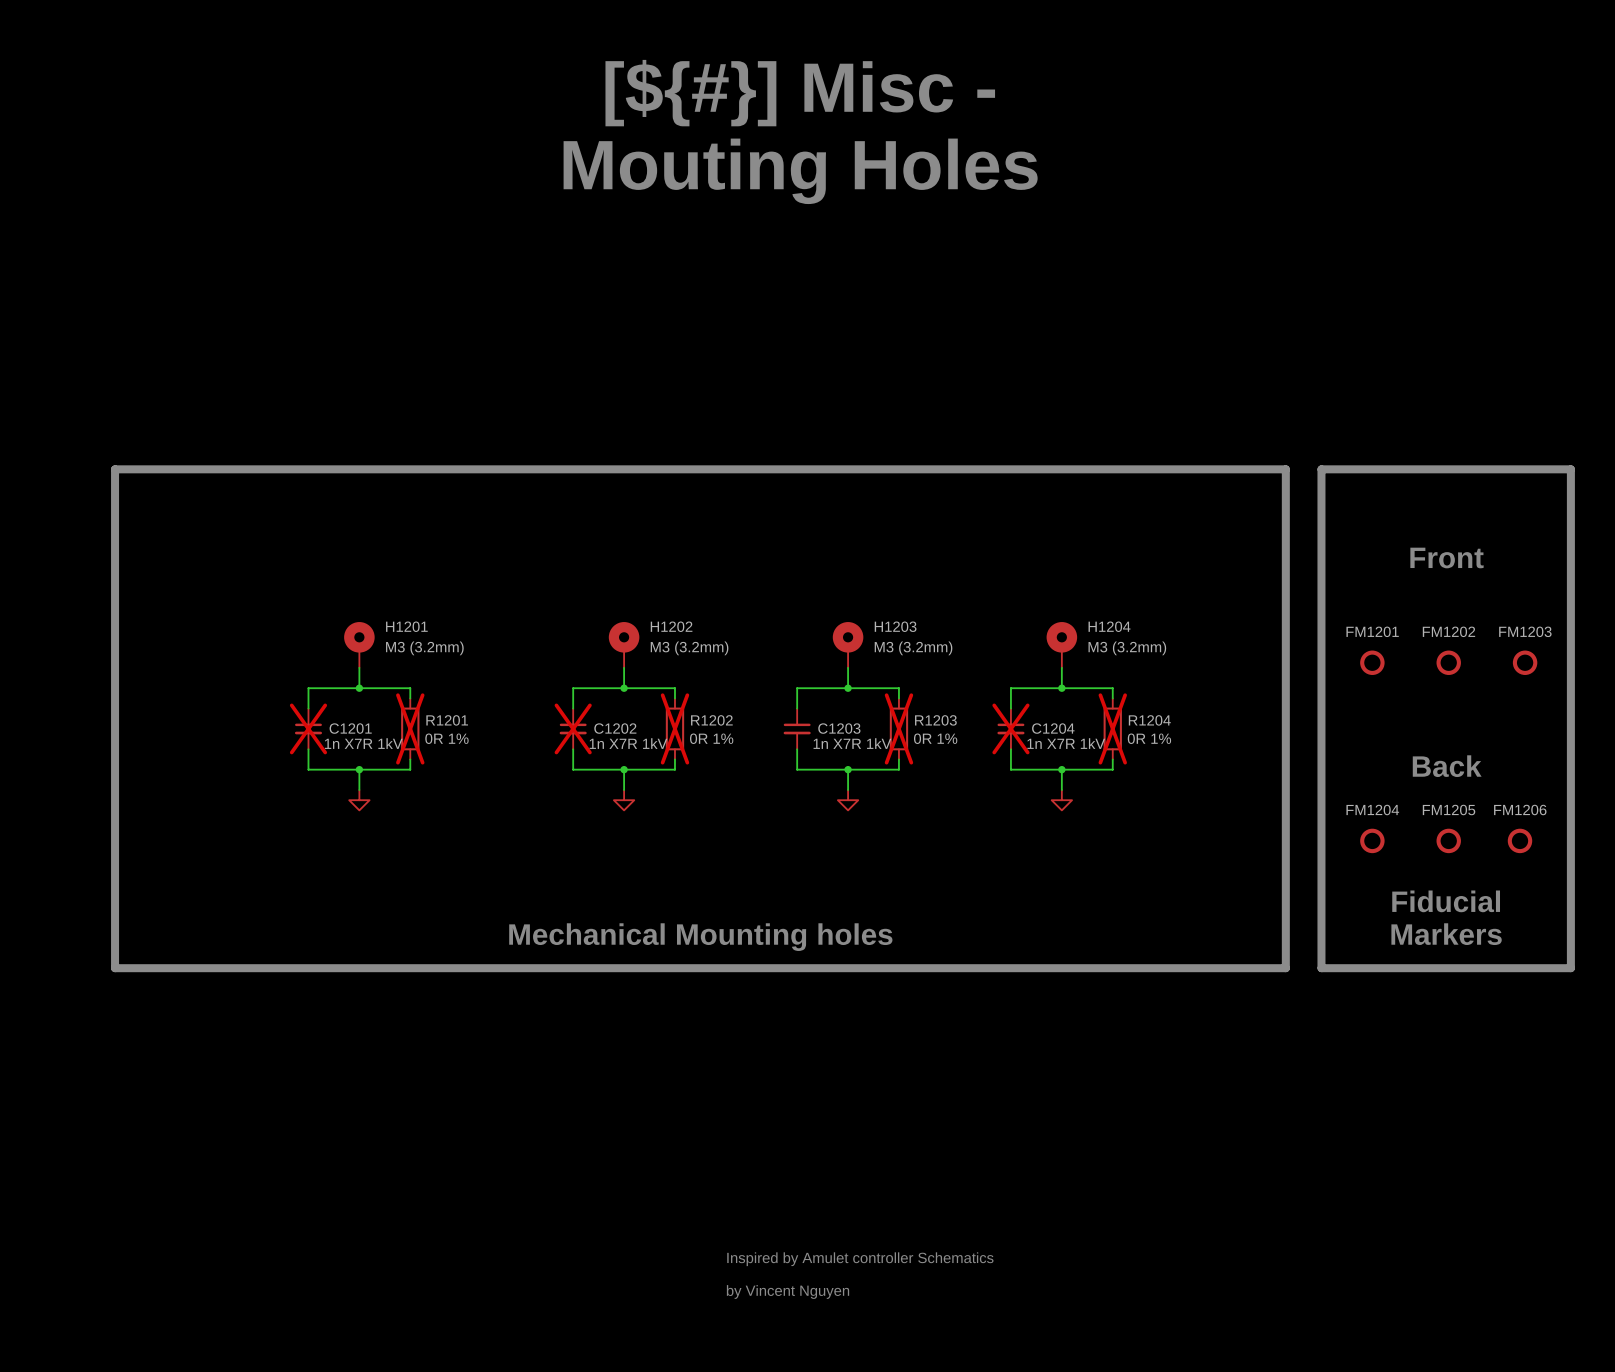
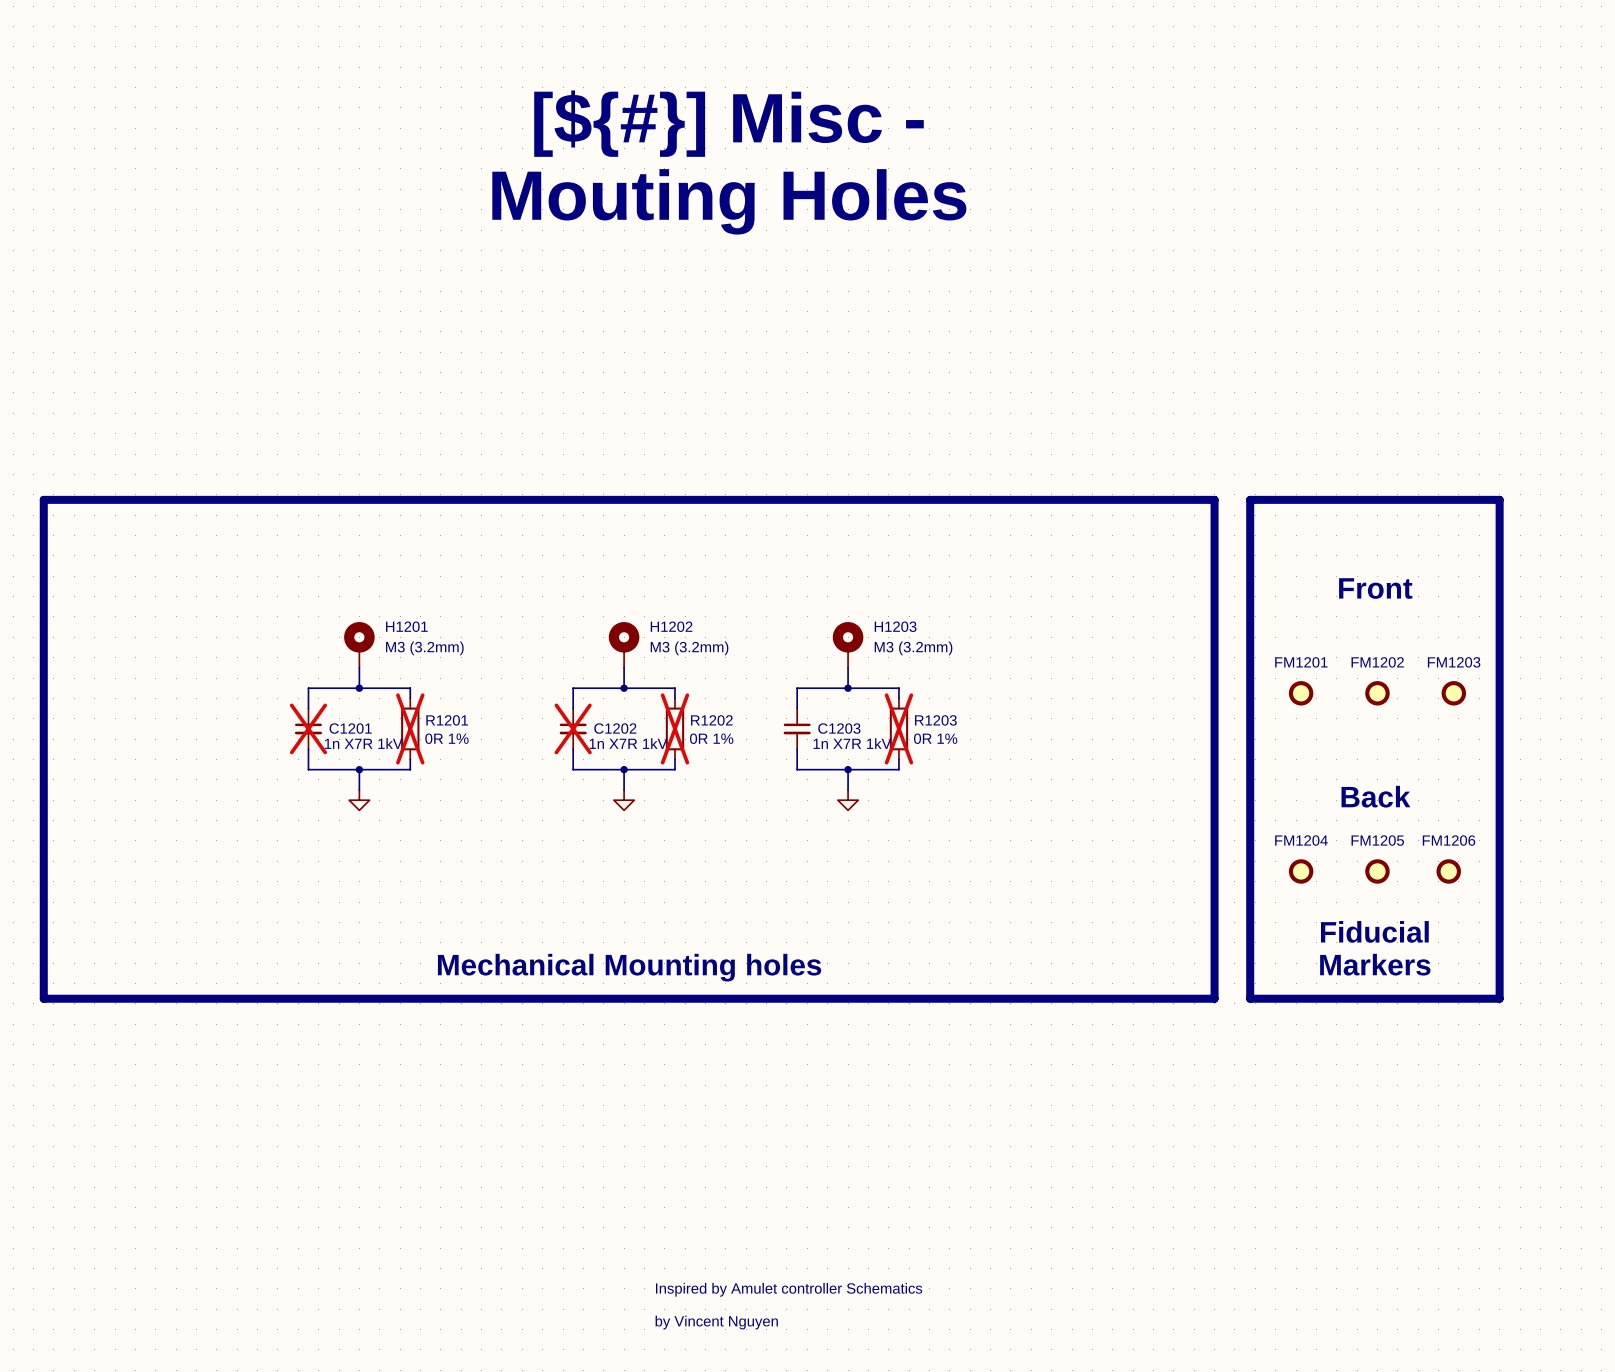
text position: [${#}] Misc - (800, 93) -> [${#}] Misc - (729, 123)
text position: Mouting Holes (800, 171) -> Mouting Holes (729, 201)
line: (115, 469) (1285, 469) (1285, 968) (115, 968) (115, 469) -> (43, 499) (1214, 499) (1214, 998) (43, 998) (43, 499)
line: (1321, 469) (1570, 469) (1570, 968) (1321, 968) (1321, 469) -> (1250, 499) (1499, 499) (1499, 998) (1250, 998) (1250, 499)
text position: Front (1446, 558) -> Front (1375, 588)
H1204: M3 (3.2mm) (1061, 644) -> none
FM1201 position: (1372, 662) -> (1301, 693)
FM1202 position: (1448, 662) -> (1377, 693)
FM1203 position: (1525, 662) -> (1453, 693)
wire: (1061, 667) (1061, 688) -> none
junction: (1061, 688) -> none
wire: (1112, 698) (1112, 688) (1010, 688) (1010, 708) -> none
C1204: 1n X7R 1kV (1010, 728) -> none
R1204: 0R 1% (1112, 728) -> none
wire: (1010, 749) (1010, 769) (1112, 769) (1112, 759) -> none
text position: Back (1447, 766) -> Back (1375, 796)
wire: (1061, 769) (1061, 790) -> none
junction: (1061, 769) -> none
power symbol: (1061, 800) -> none
FM1204 position: (1372, 840) -> (1301, 871)
FM1205 position: (1448, 840) -> (1377, 871)
FM1206 position: (1520, 840) -> (1448, 871)
text position: Fiducial (1446, 901) -> Fiducial (1374, 931)
text position: Markers (1446, 934) -> Markers (1375, 964)
text position: Mechanical Mounting holes (700, 937) -> Mechanical Mounting holes (629, 967)
text position: Inspired by Amulet controller Schematics (860, 1259) -> Inspired by Amulet controller Schematics (789, 1289)
text position: by Vincent Nguyen (788, 1291) -> by Vincent Nguyen (716, 1322)

